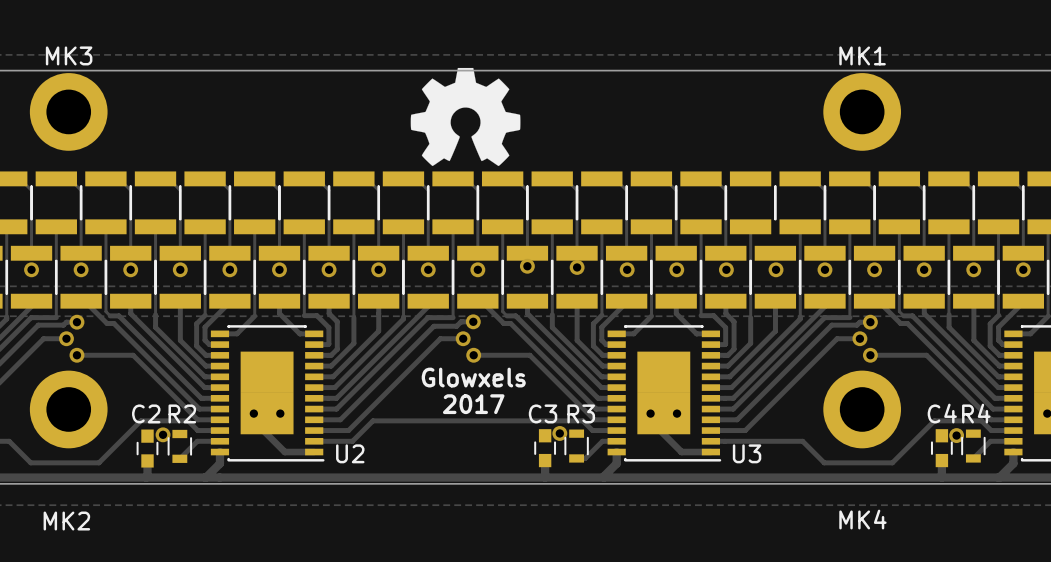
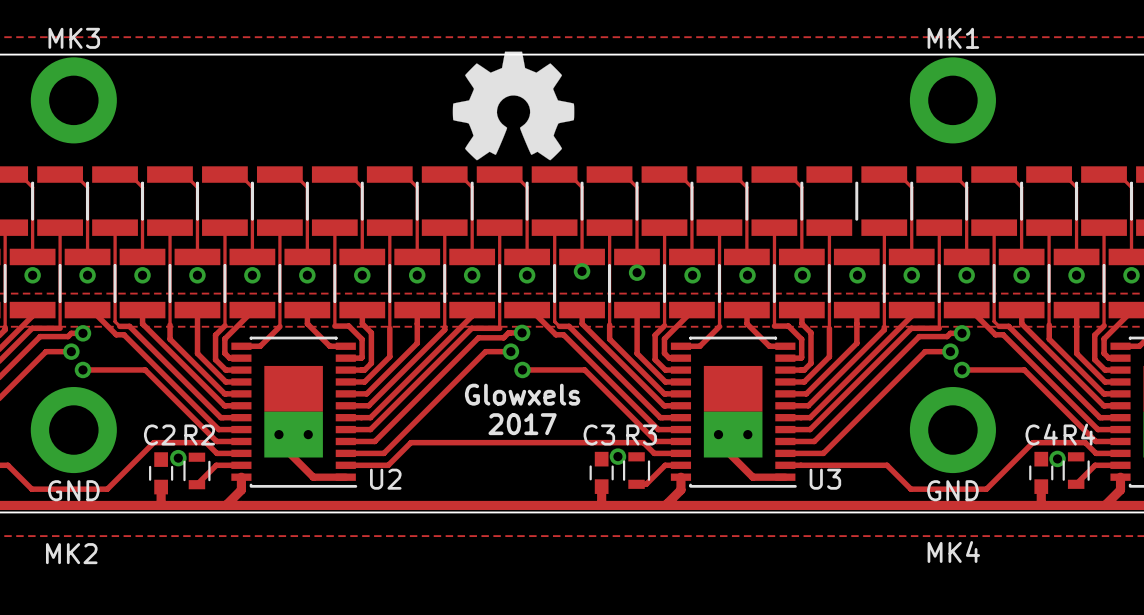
MK2 value: none -> GND (73, 490)
MK4 value: none -> GND (952, 490)

